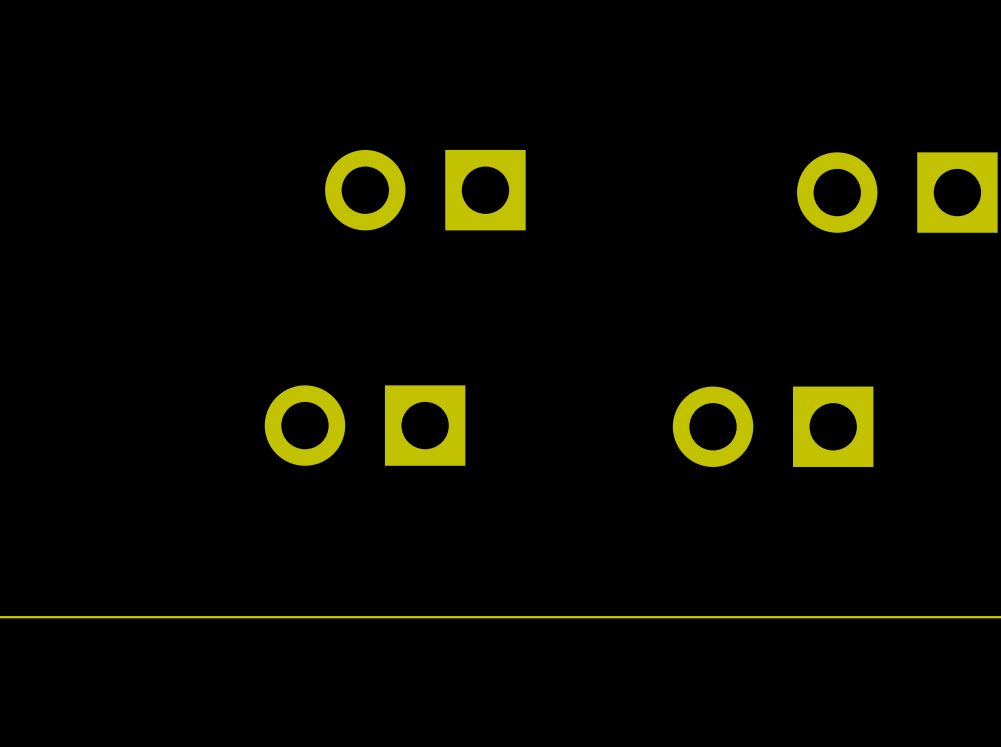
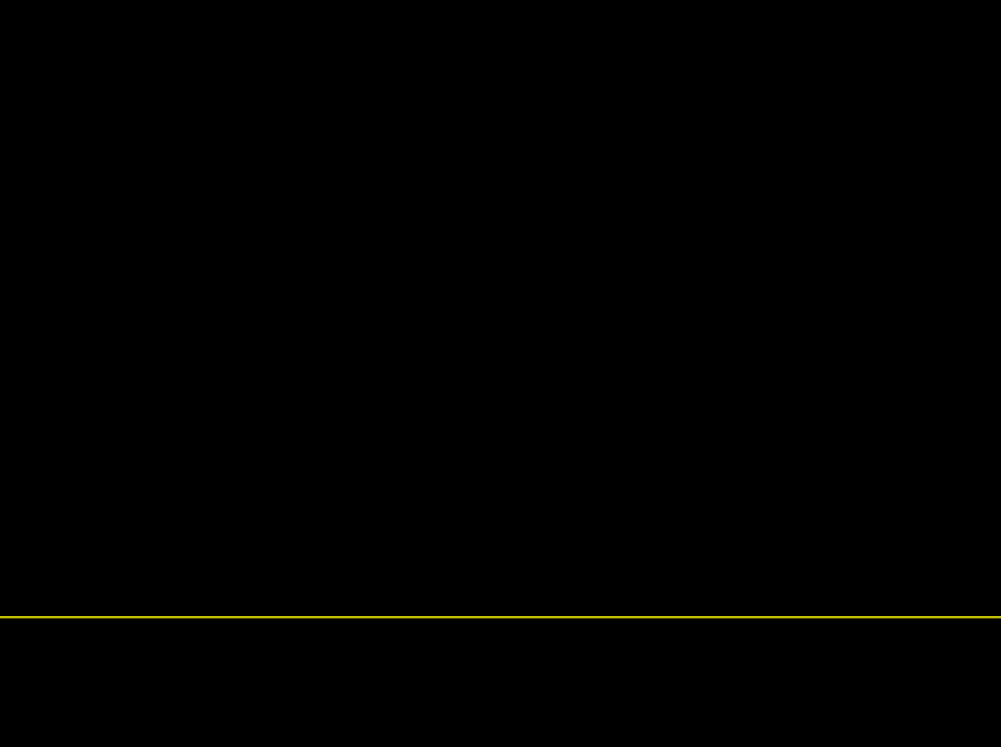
part: (425, 190) -> none
part: (897, 192) -> none
part: (365, 425) -> none
part: (773, 426) -> none

